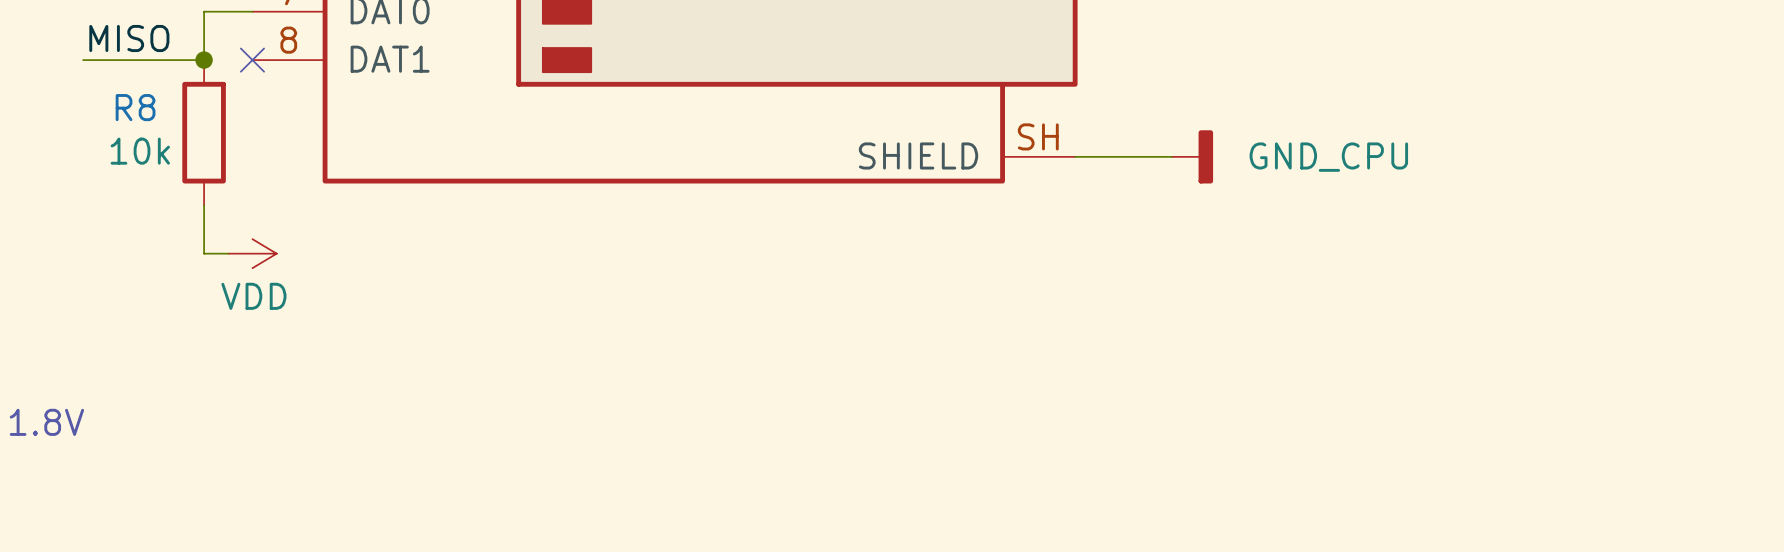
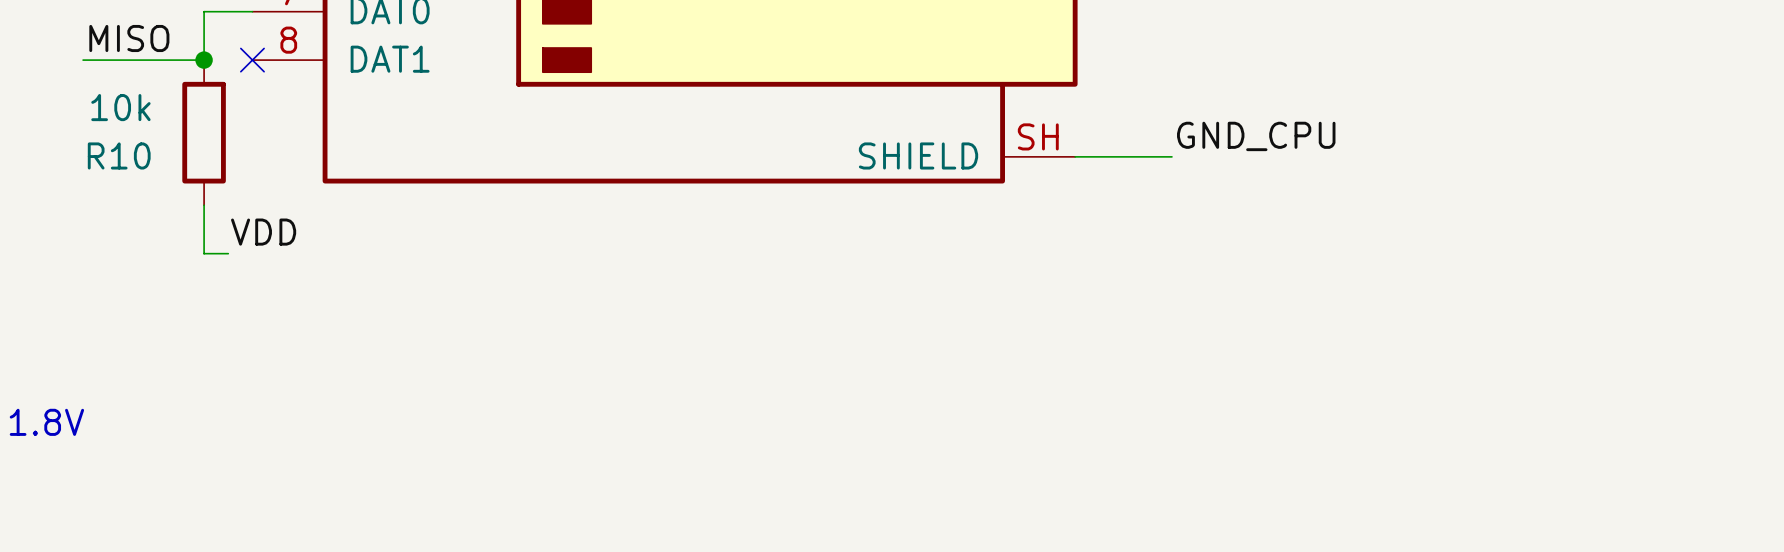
R8 name: R8 (135, 107) -> R10 (119, 155)
label: none -> GND_CPU (1256, 136)
R8 value position: 10k (140, 151) -> 10k (120, 107)
power symbol: GND_CPU (1192, 156) -> none
label: none -> VDD (263, 232)
power symbol: VDD (252, 253) -> none

